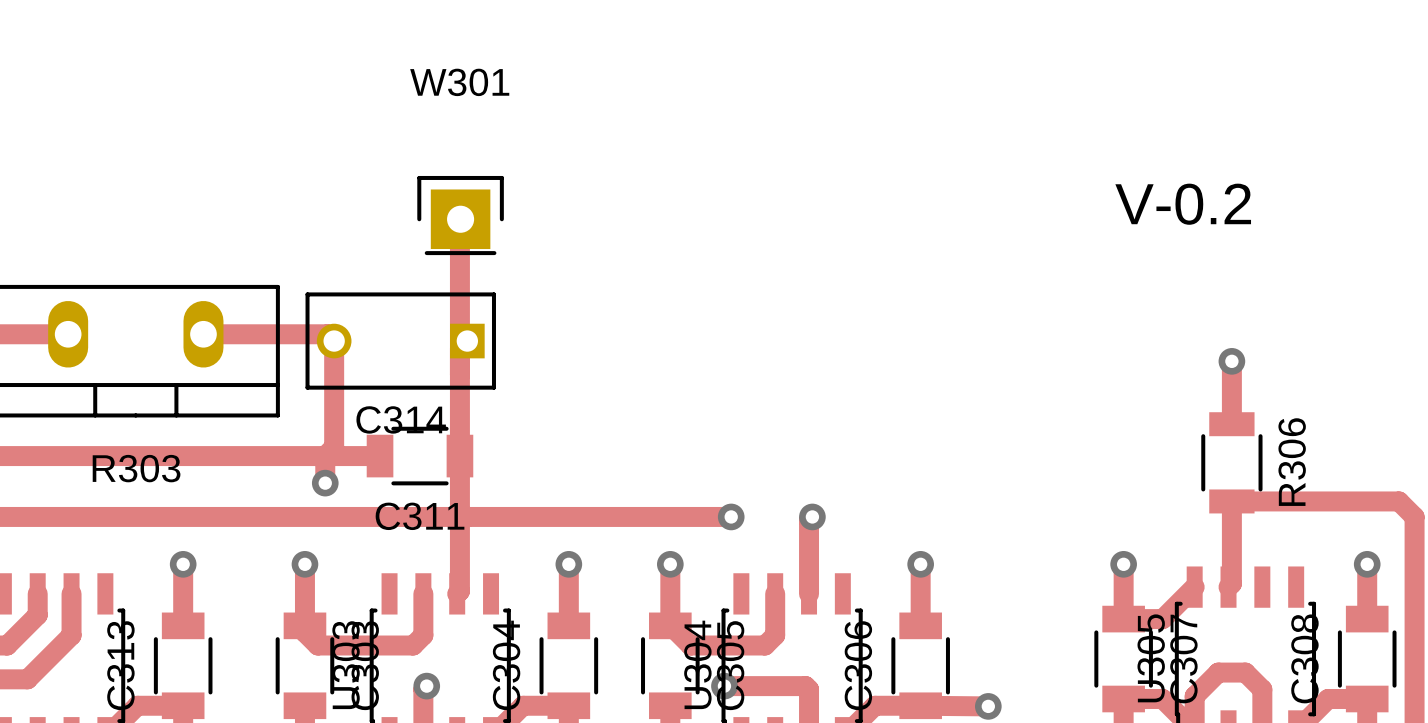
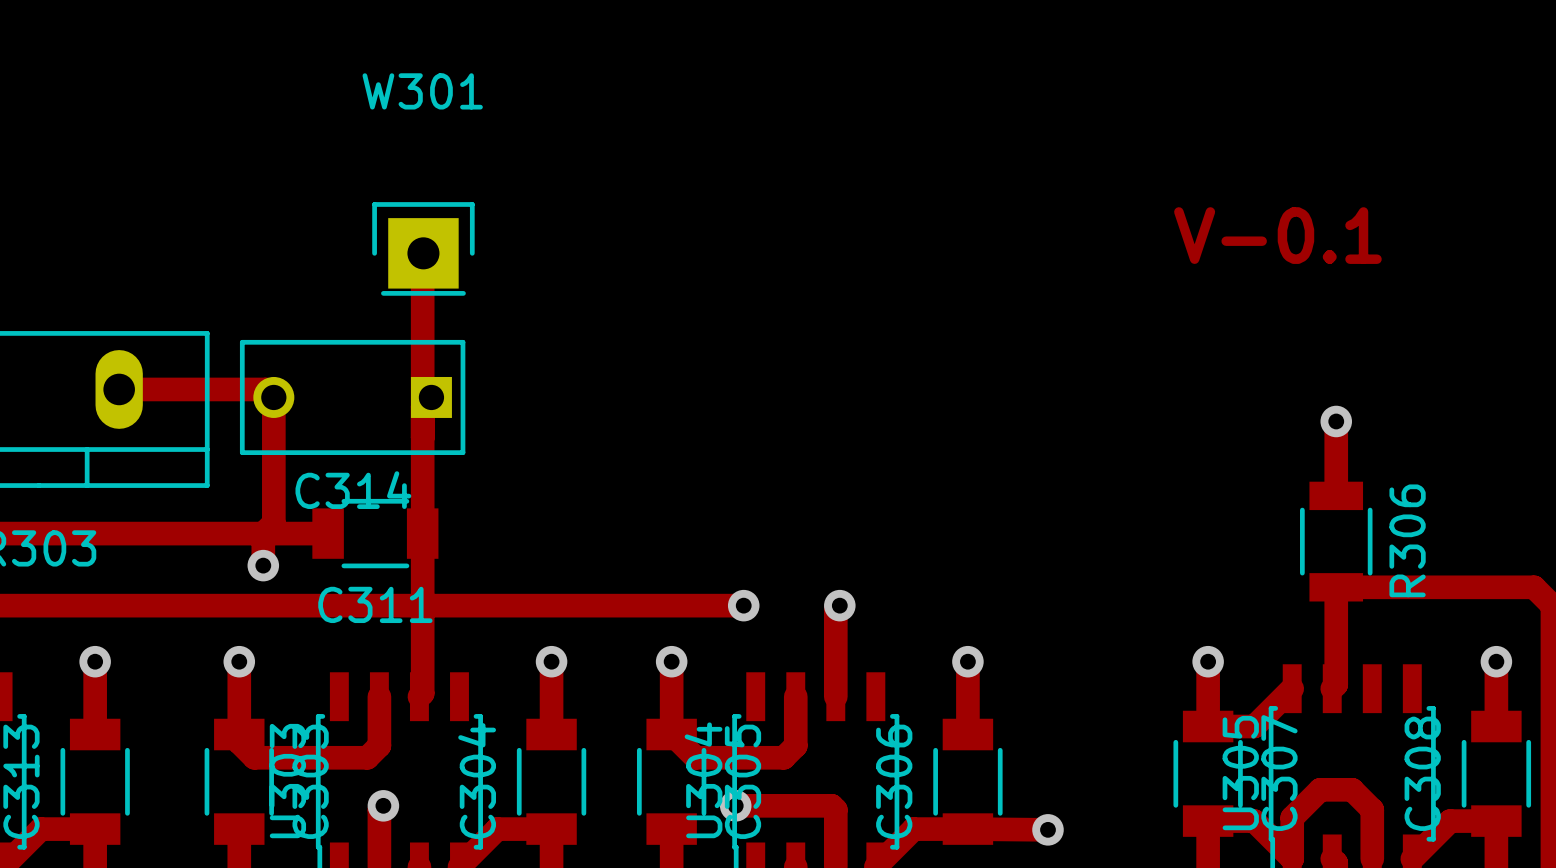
text: V-0.2 (1183, 204) -> V-0.1 (1277, 235)

